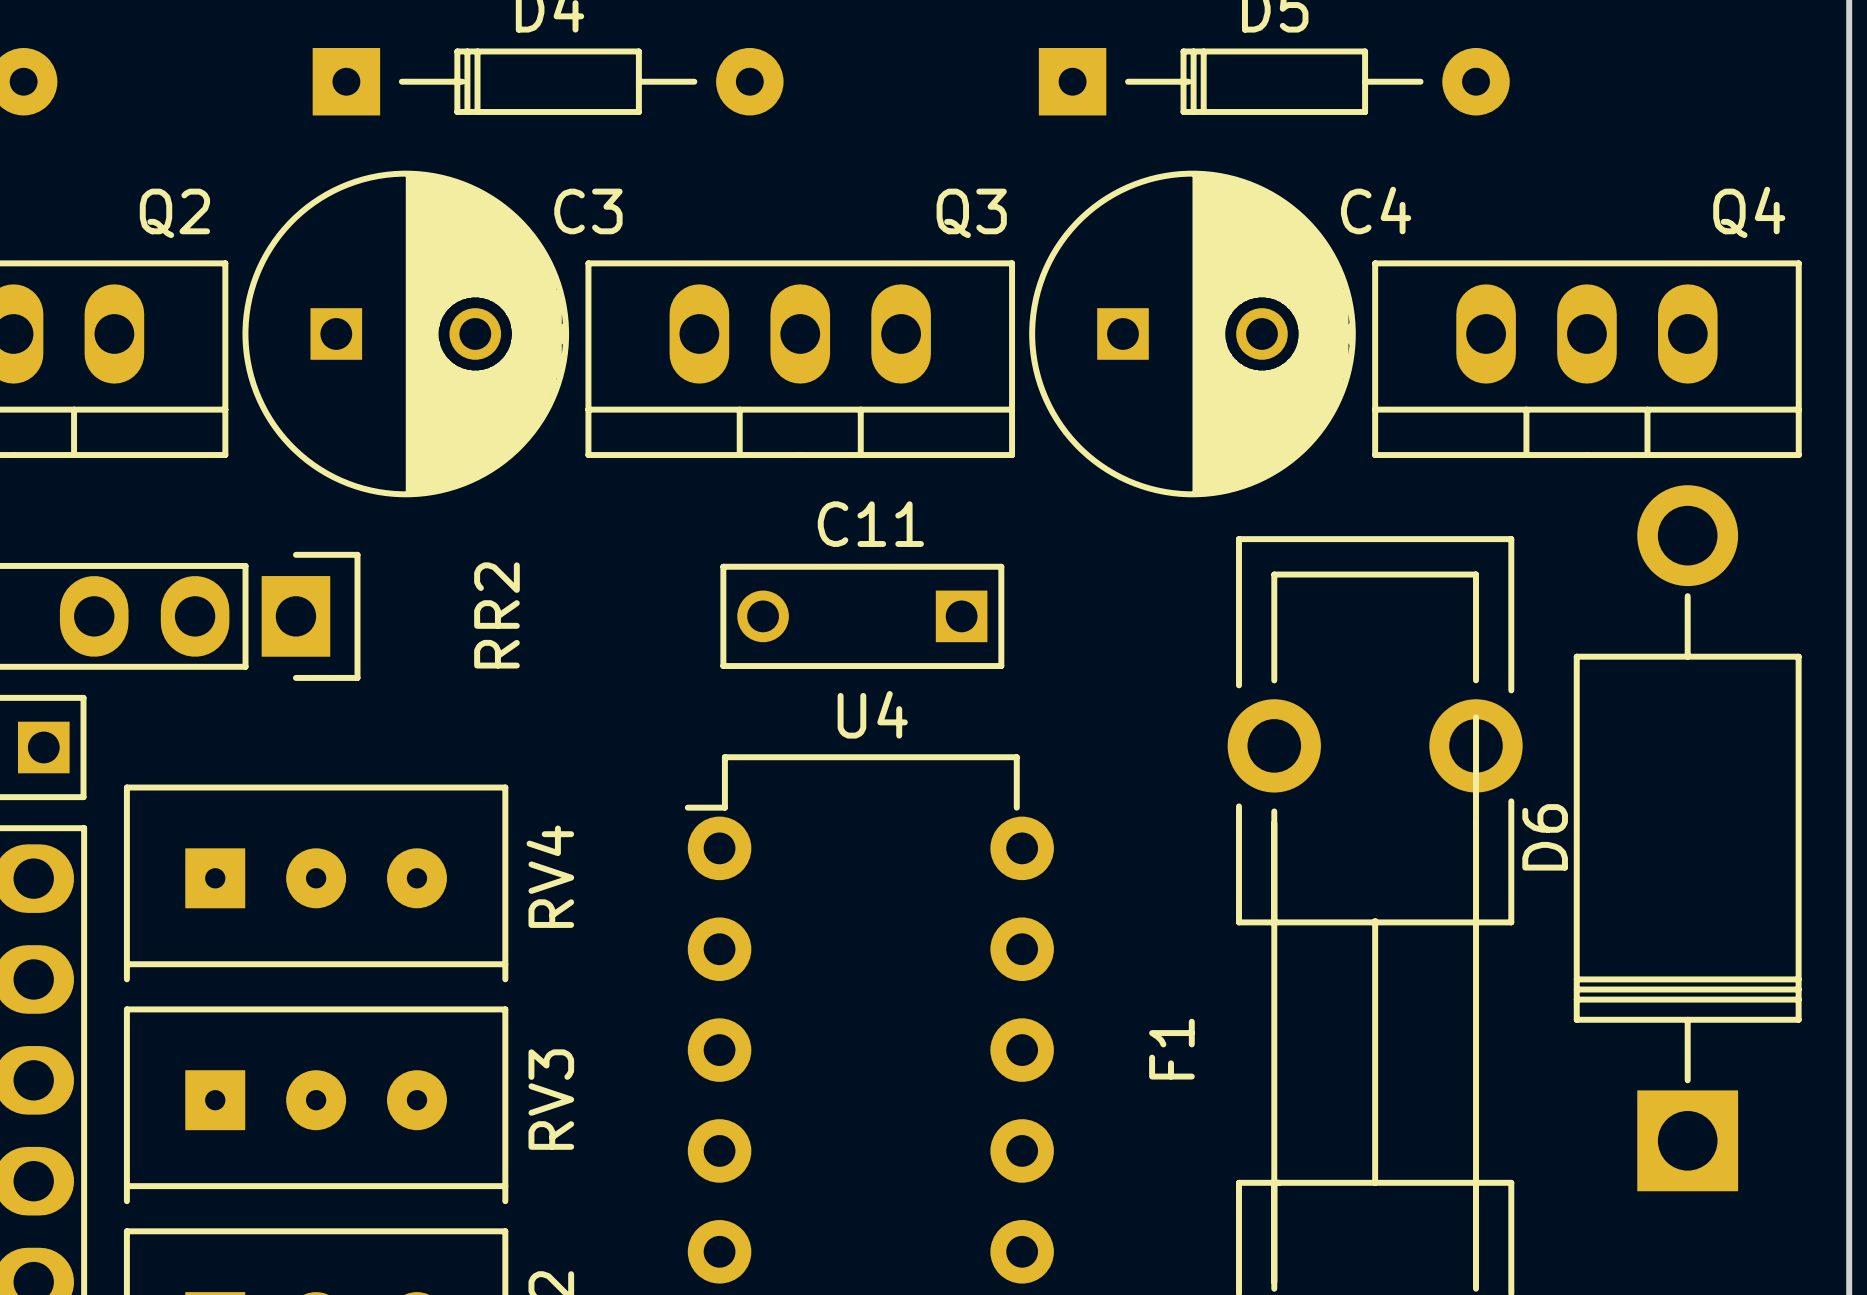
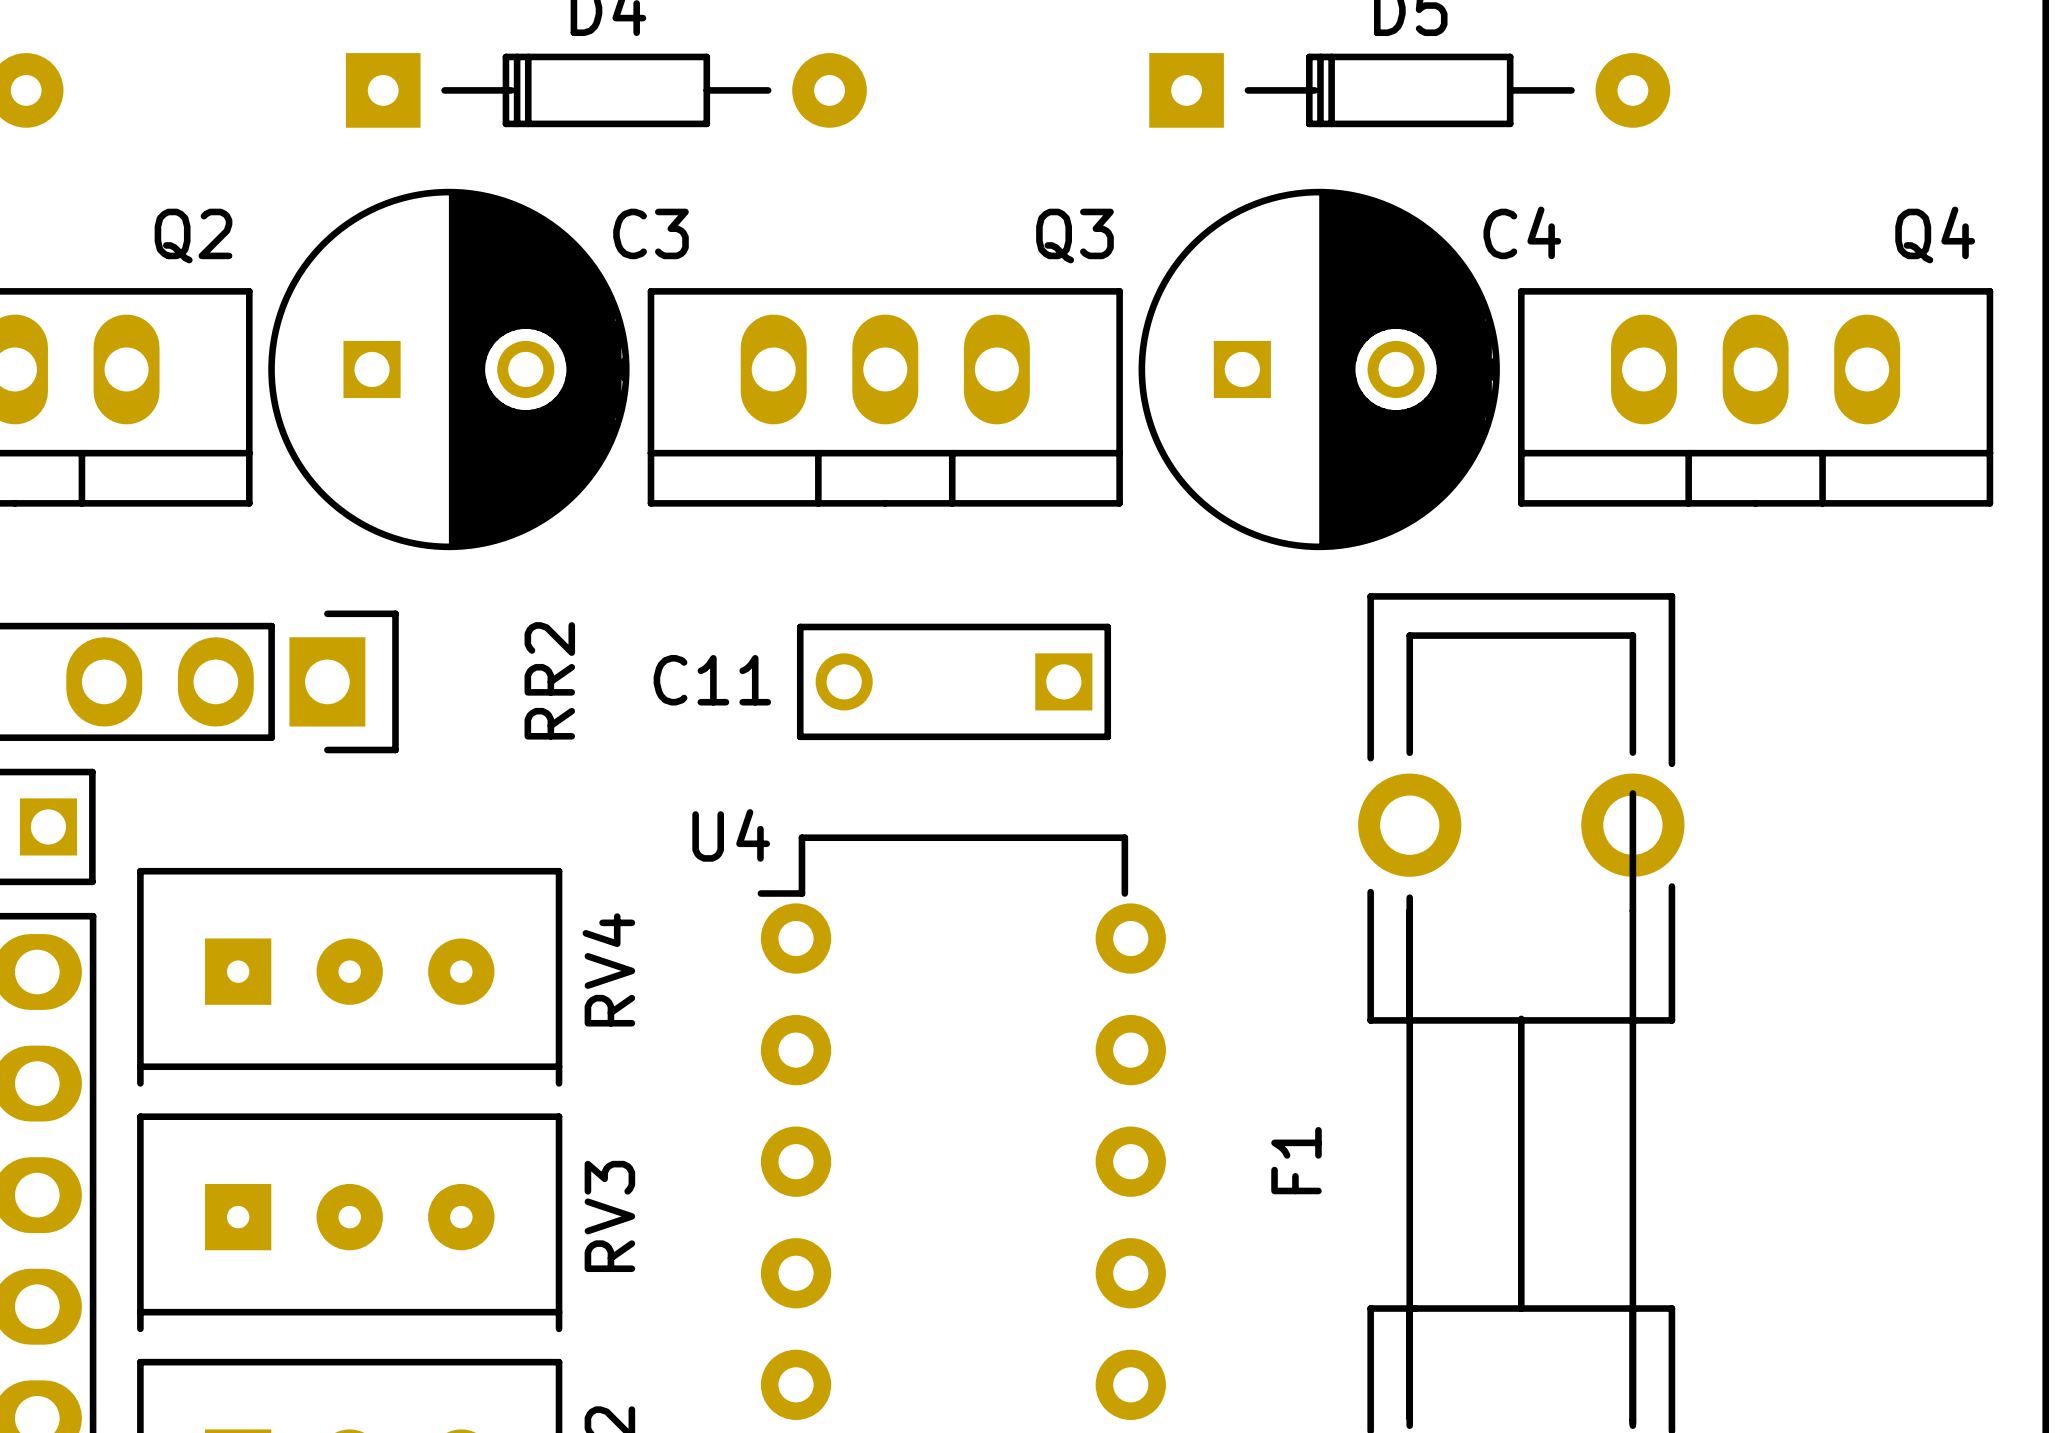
C11 name position: C11 (870, 524) -> C11 (712, 680)
U4 name position: U4 (872, 714) -> U4 (731, 835)
D6: (1687, 838) -> none

